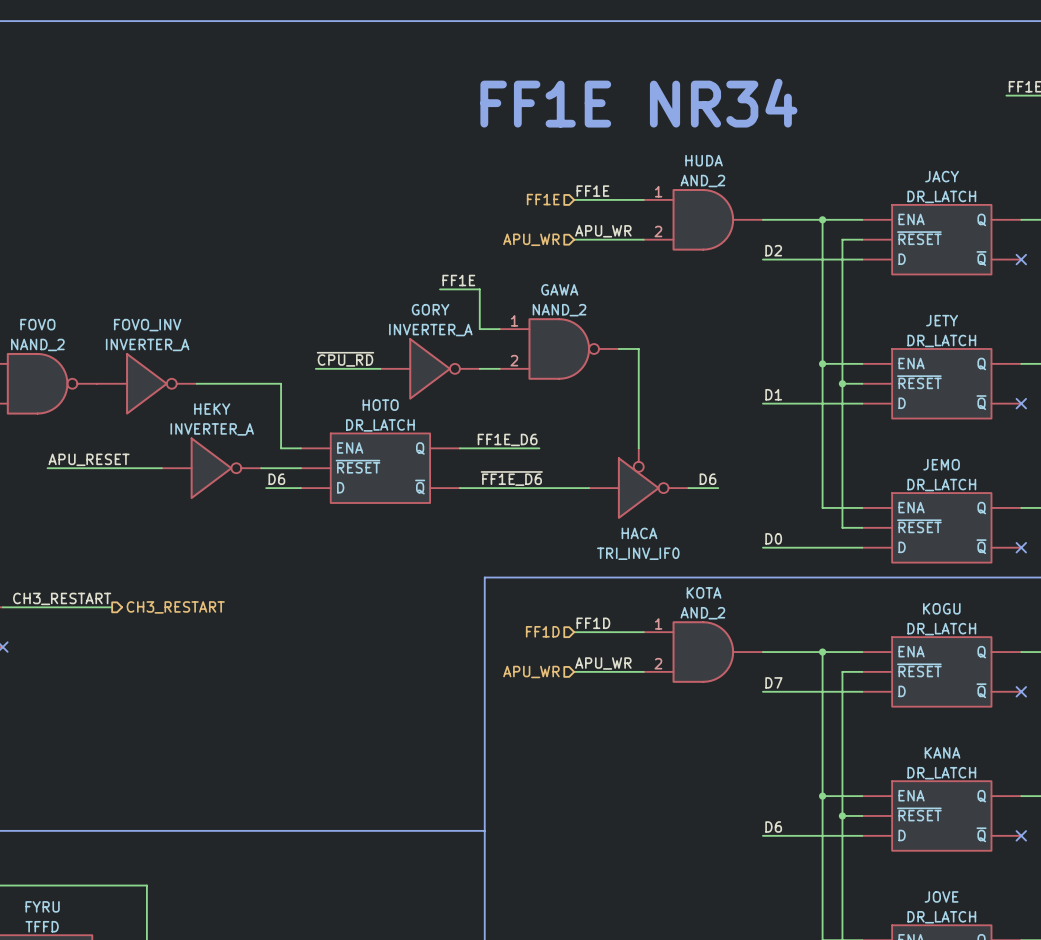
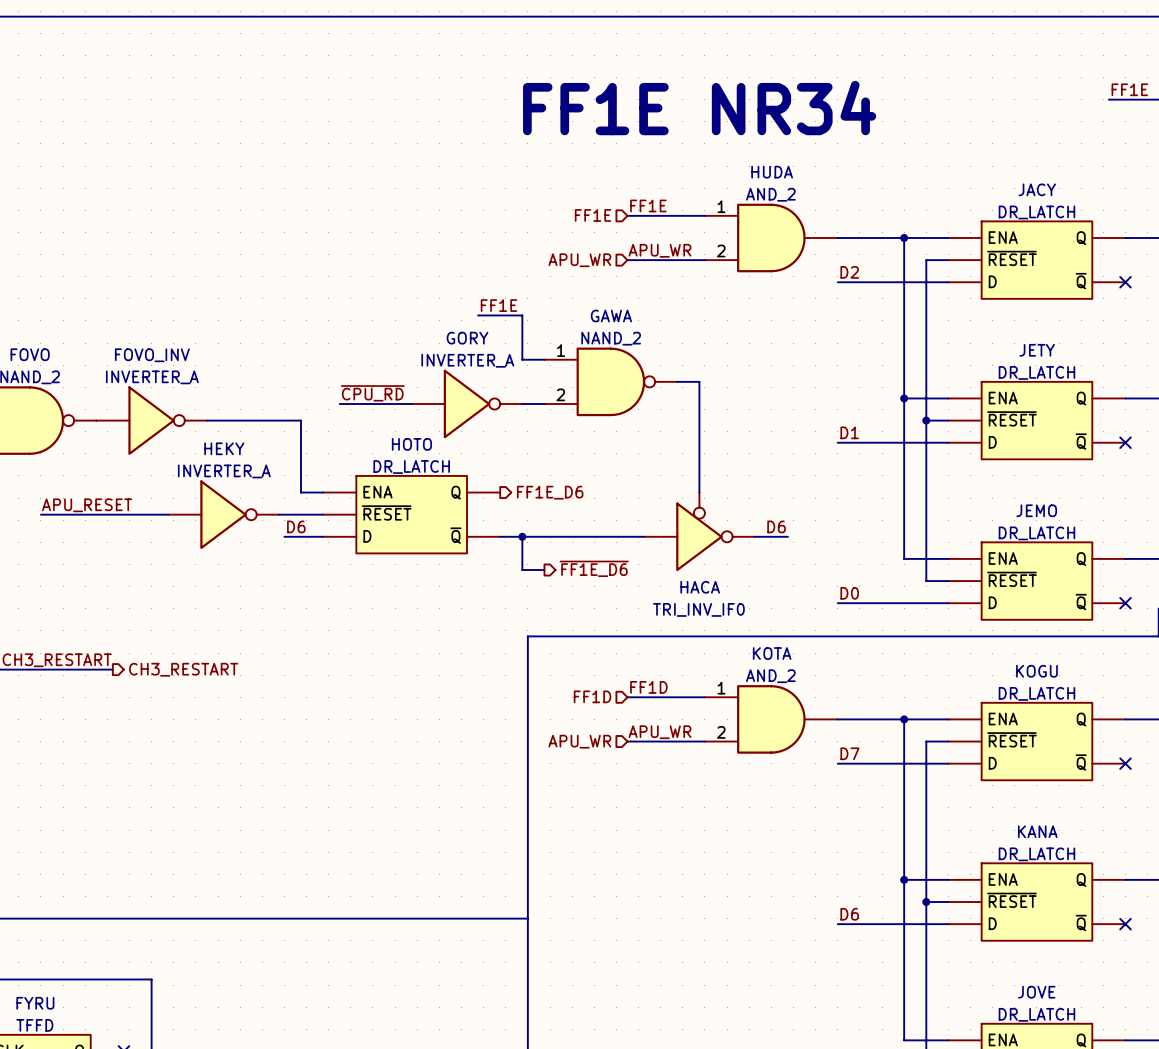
label: FF1E_D6 (507, 439) -> none
wire: (459, 448) (539, 448) -> none
hierarchical label: none -> FF1E_D6 (550, 492)
label: ~{FF1E_D6} (511, 478) -> none
wire: none -> (522, 536) (522, 570) (544, 570)
junction: none -> (522, 536)
hierarchical label: none -> ~{FF1E_D6} (594, 568)

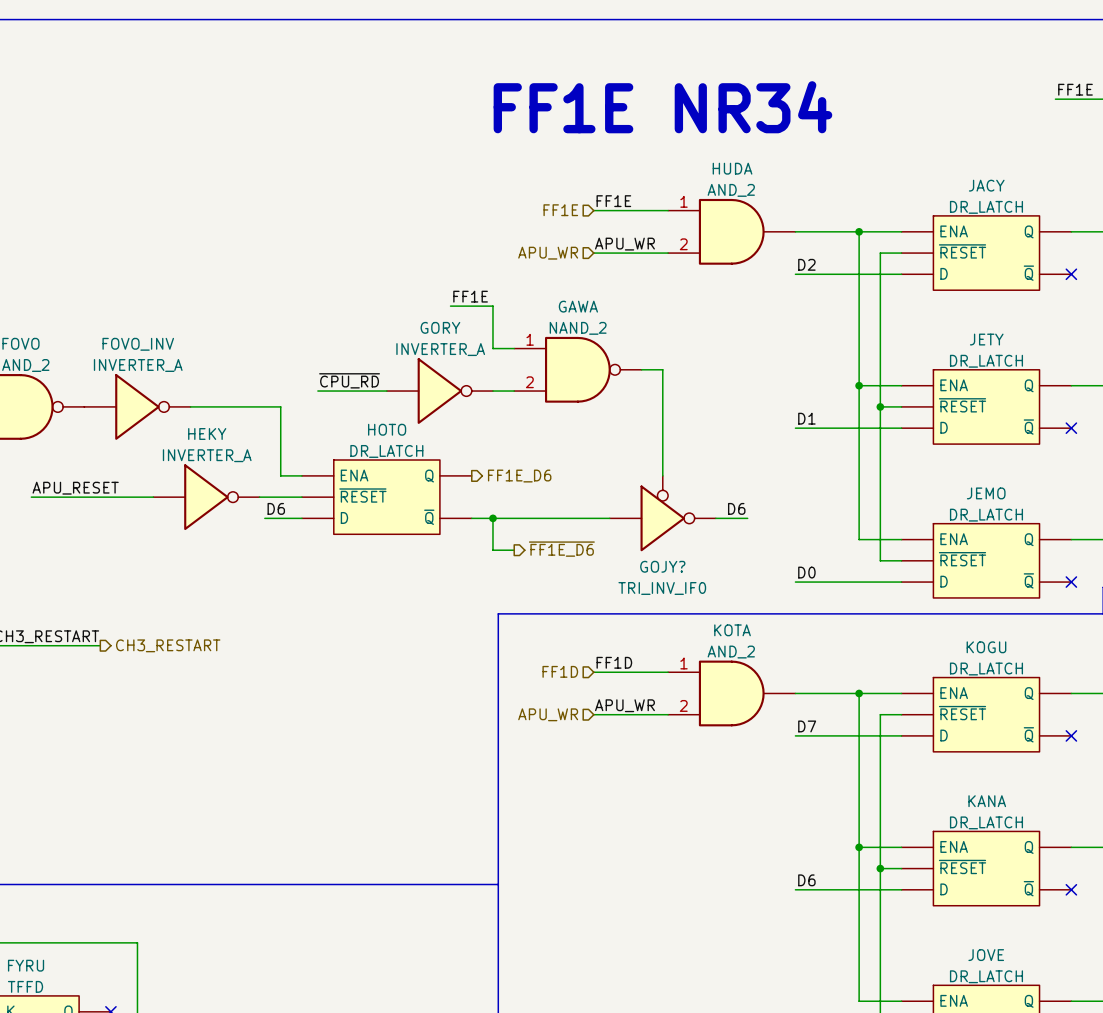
HACA name: HACA (700, 587) -> GOJY? (662, 566)

